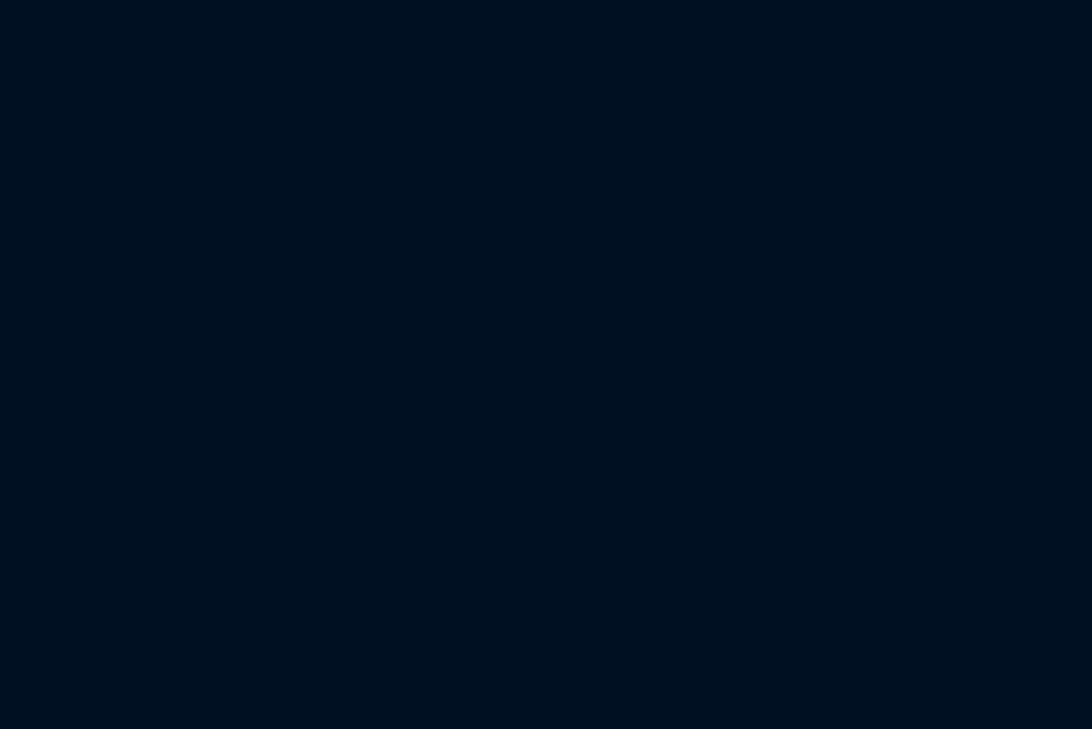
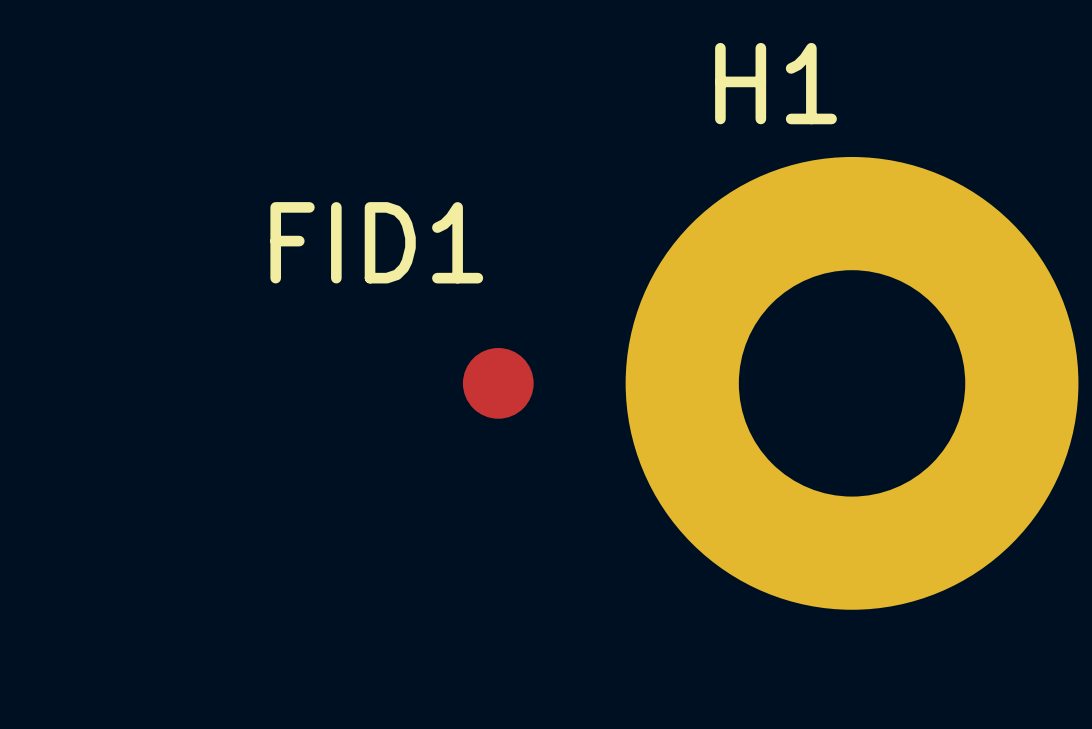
FID1: none -> (498, 383)
H1: none -> (852, 383)

